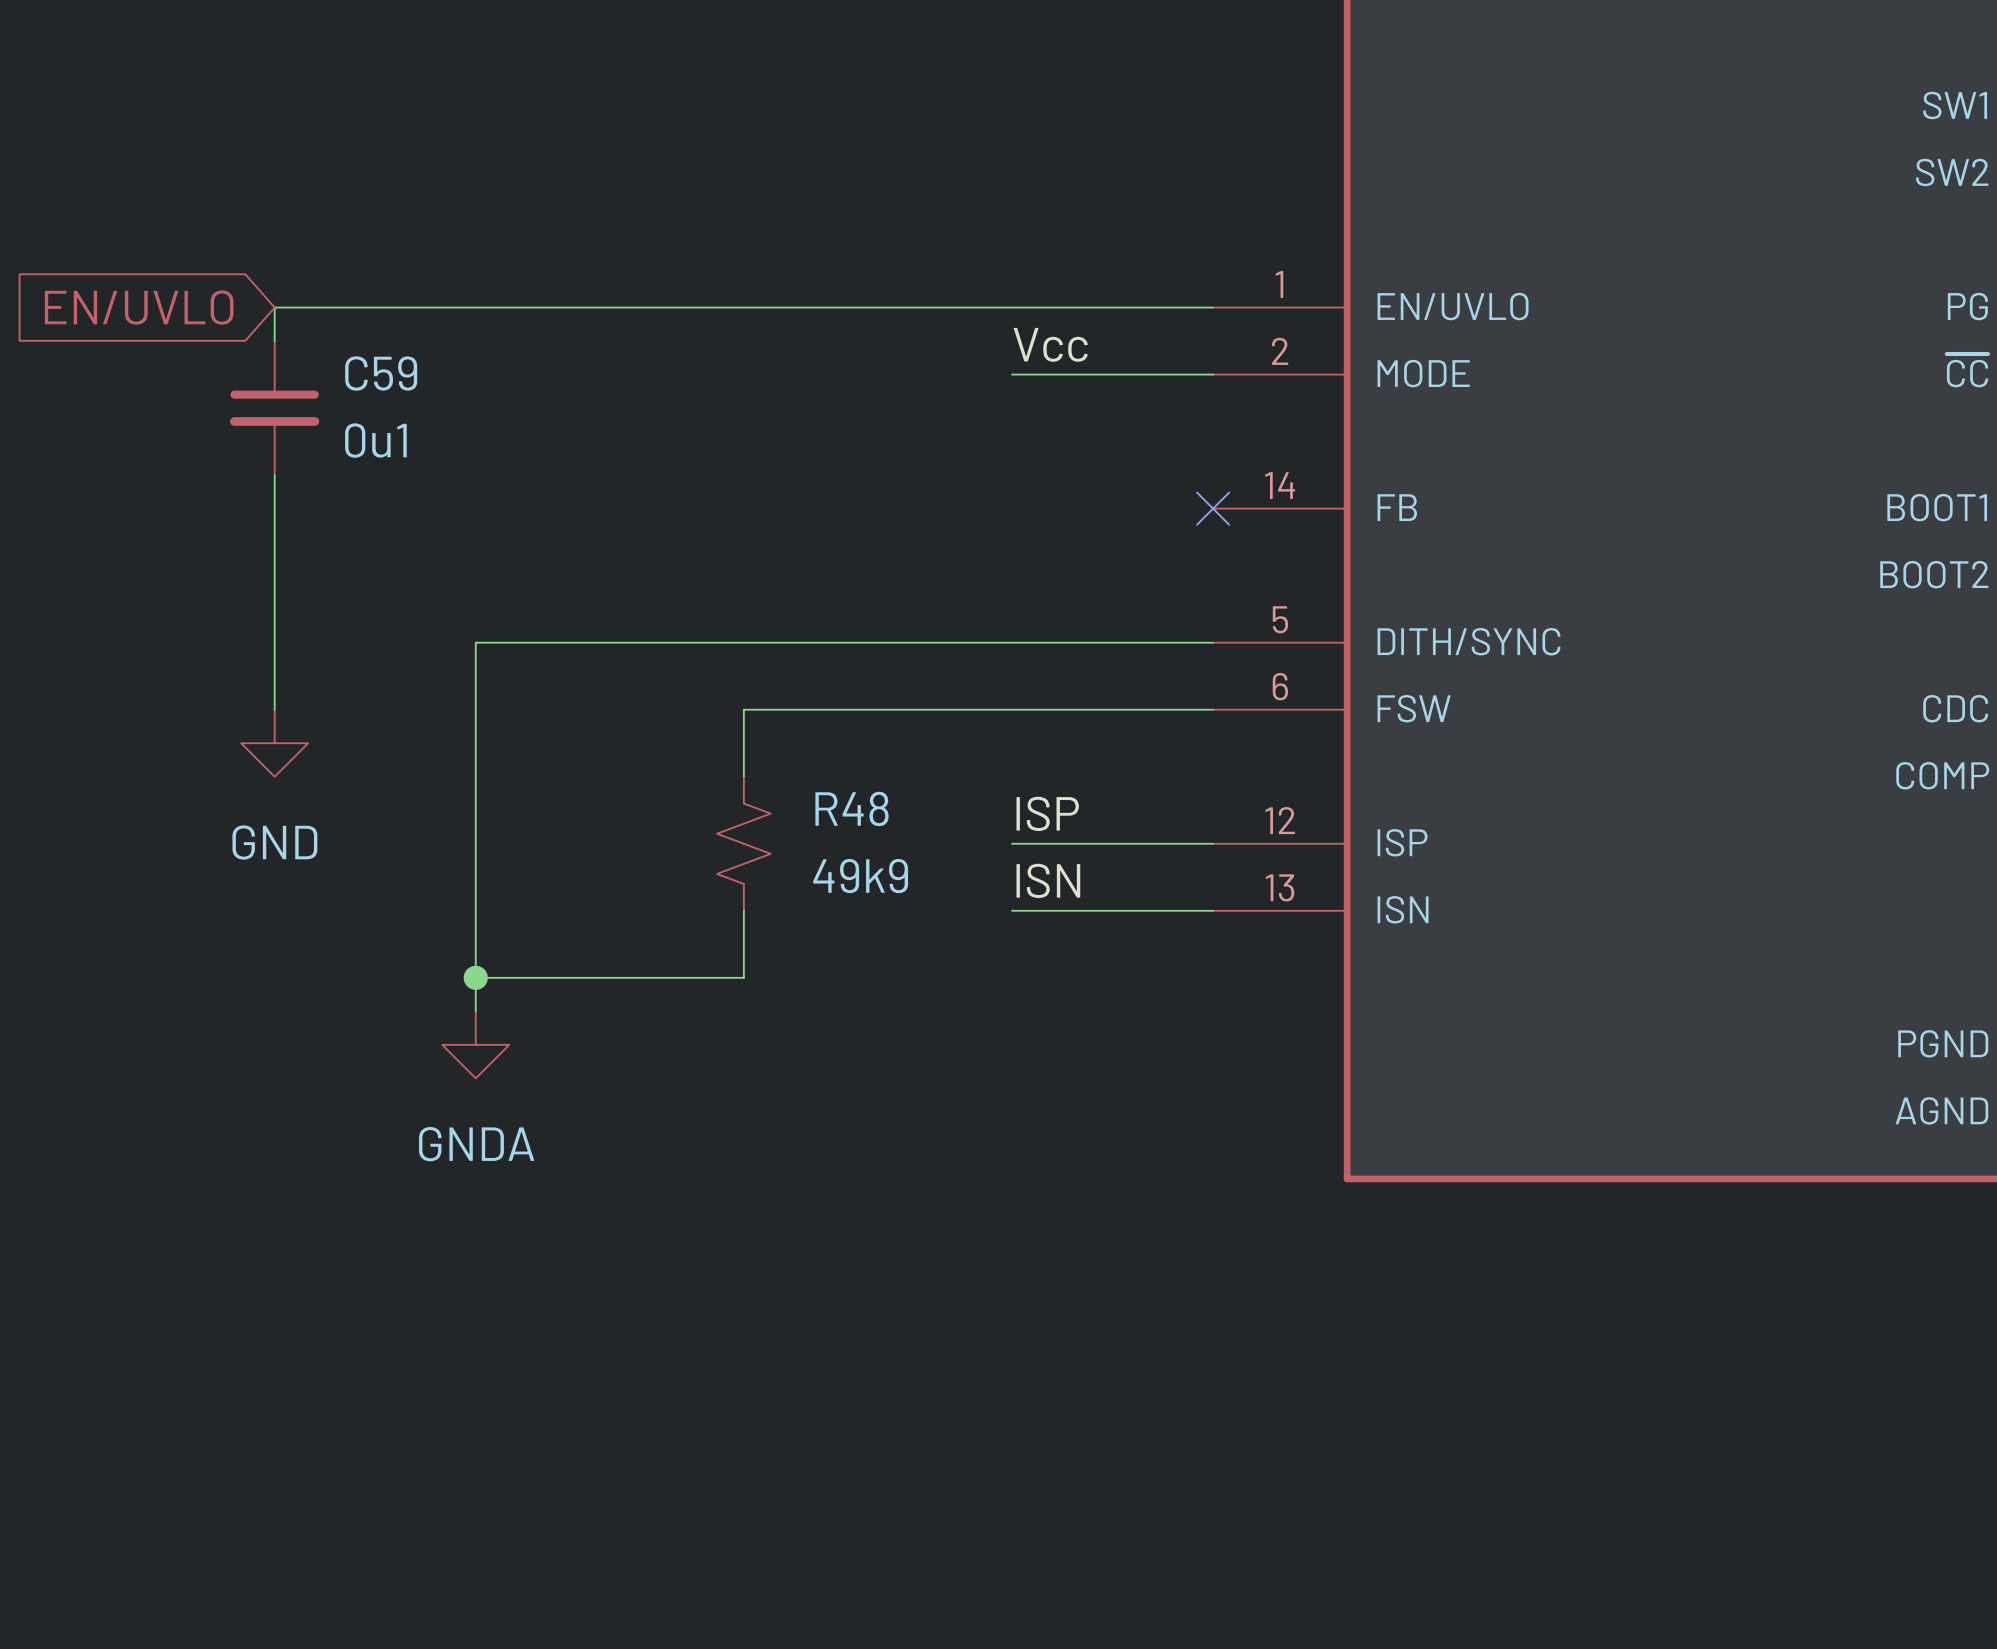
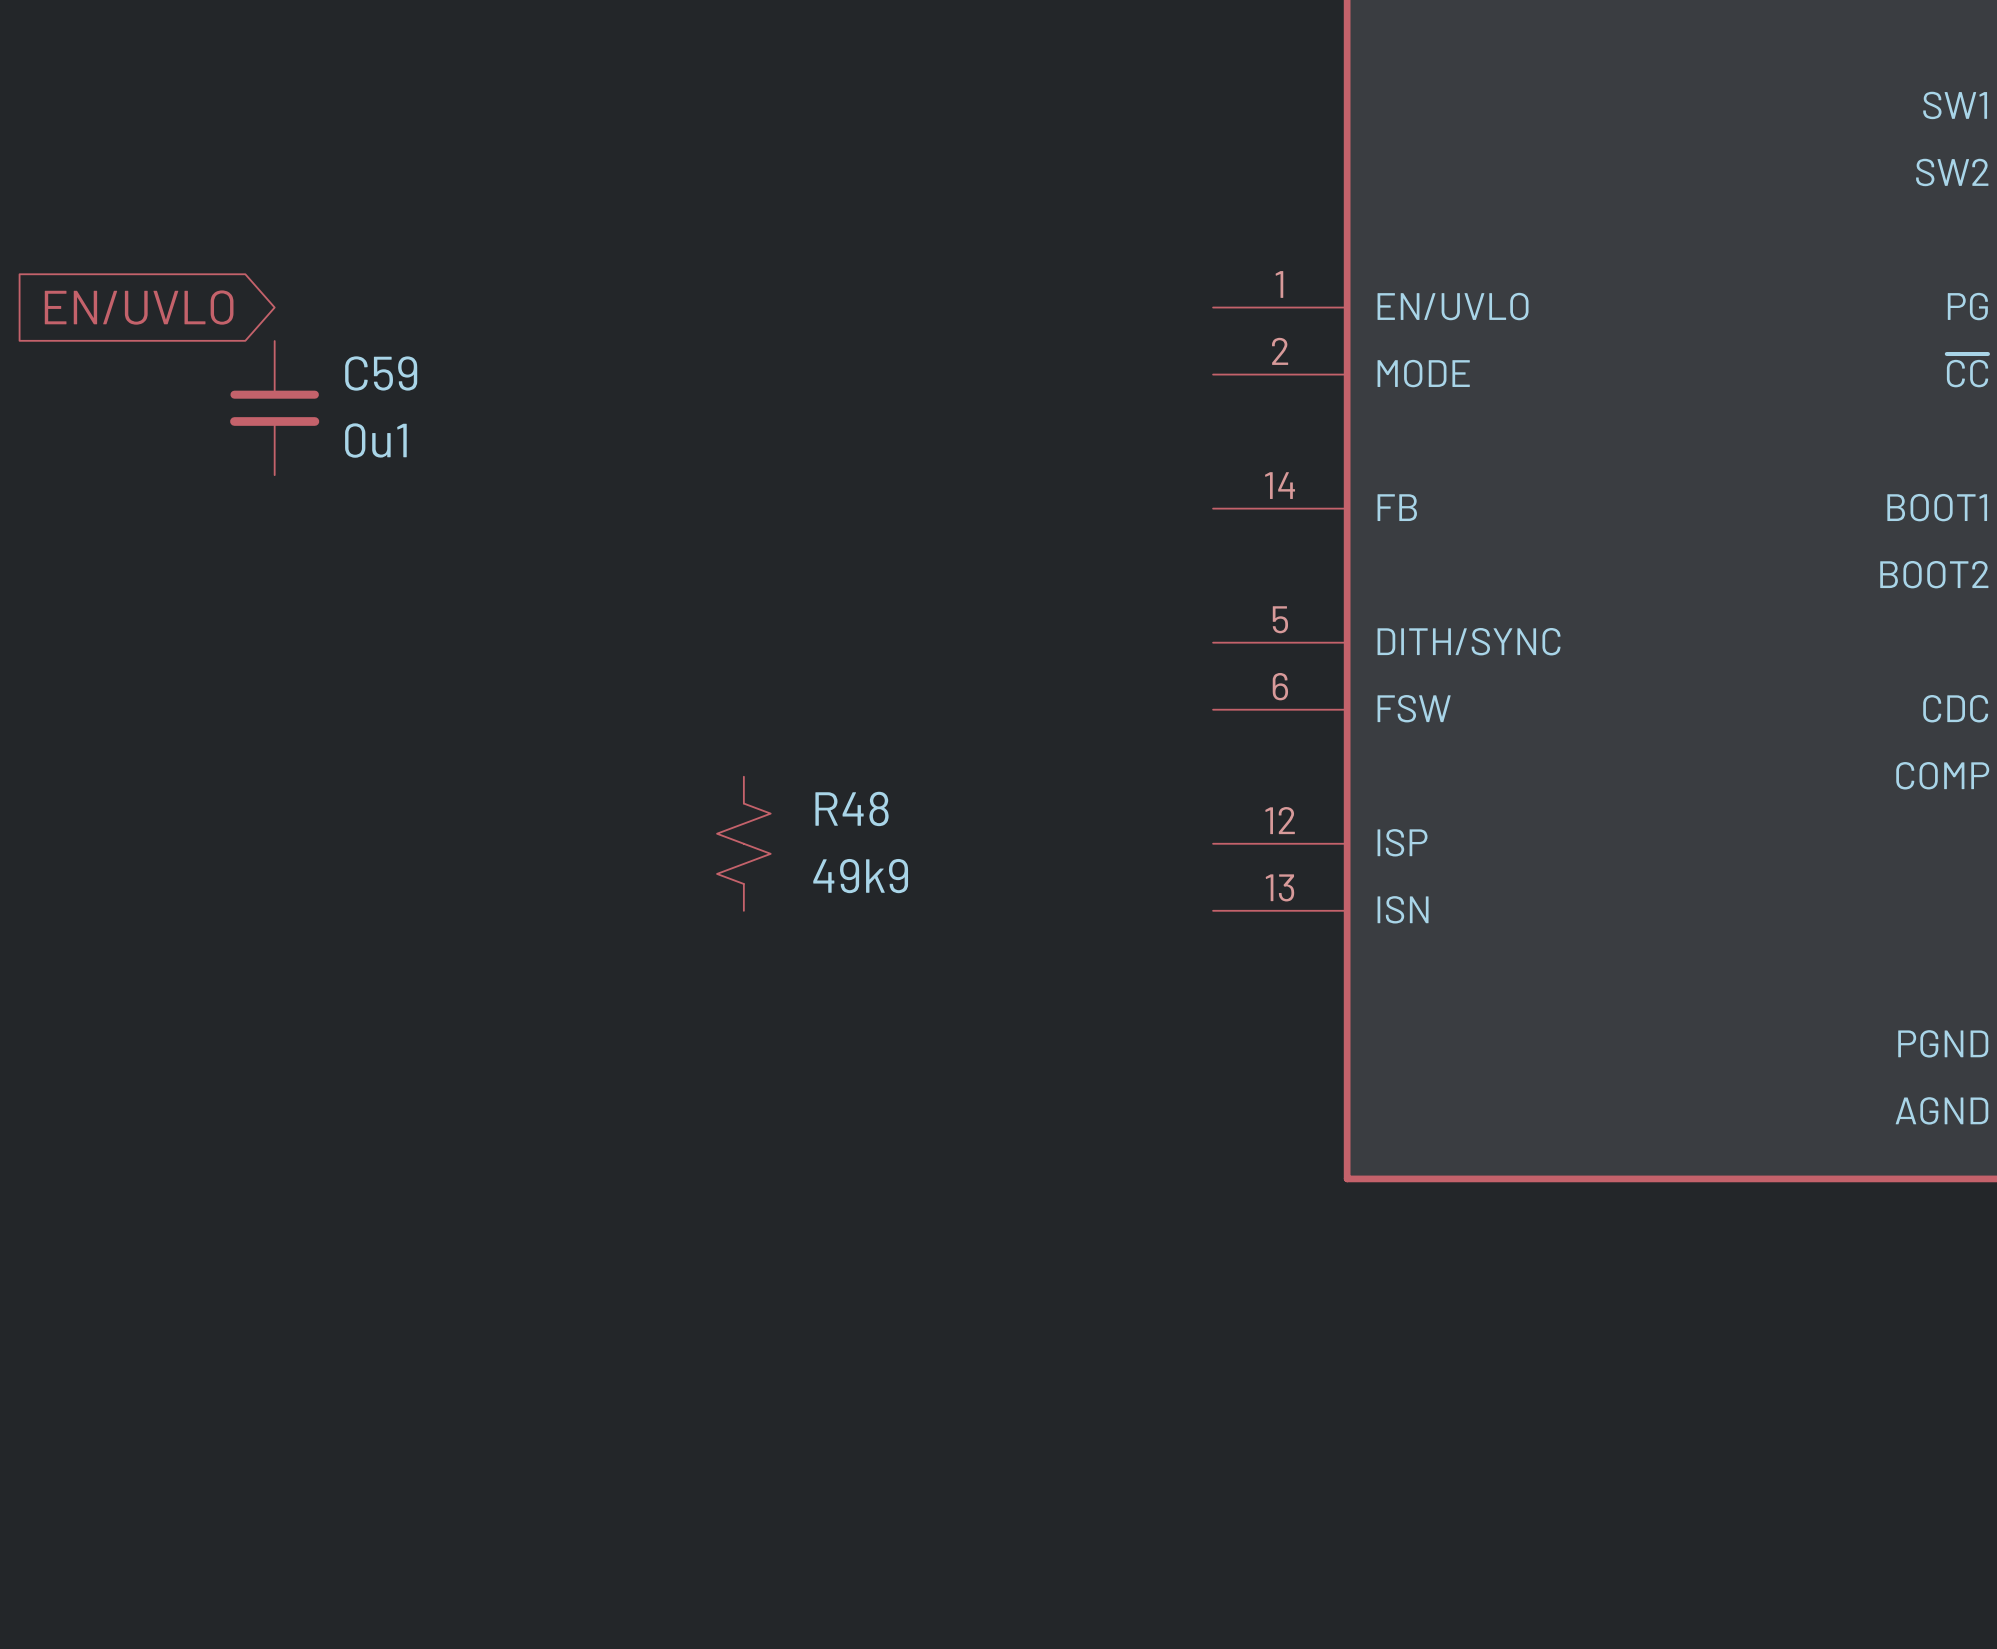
wire: (1213, 307) (274, 307) (274, 341) -> none
label: Vcc (1050, 344) -> none
wire: (1011, 374) (1213, 374) -> none
wire: (274, 475) (274, 709) -> none
no-connect mark: (1213, 508) -> none
wire: (1213, 642) (475, 642) (475, 1011) -> none
wire: (1213, 709) (743, 709) (743, 776) -> none
power symbol: GND (274, 743) -> none
label: ISP (1047, 813) -> none
wire: (1011, 843) (1213, 843) -> none
label: ISN (1048, 880) -> none
wire: (743, 910) (743, 977) (475, 977) -> none
wire: (1011, 910) (1213, 910) -> none
junction: (475, 977) -> none
power symbol: GNDA (475, 1044) -> none

